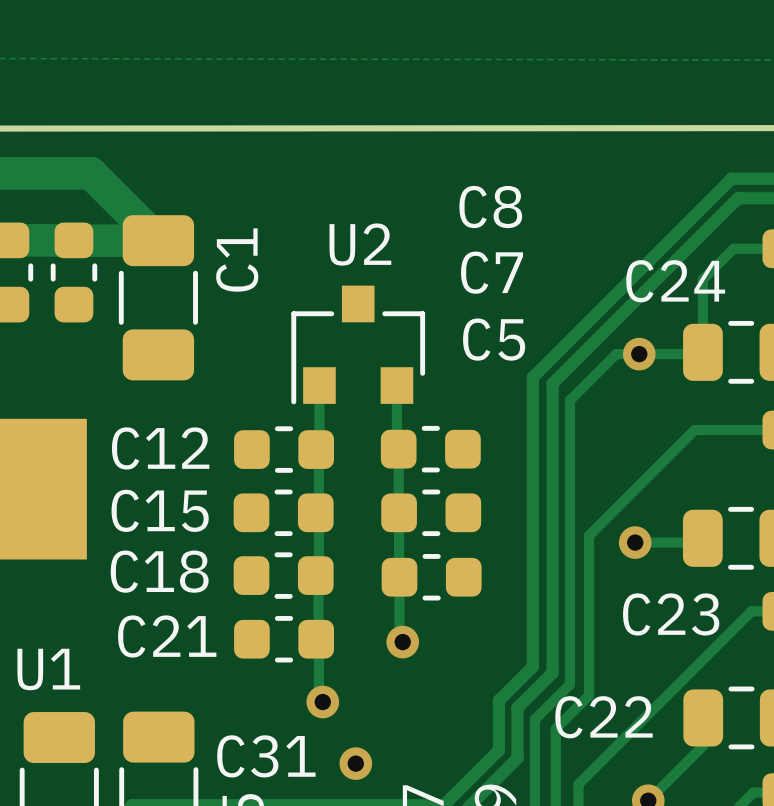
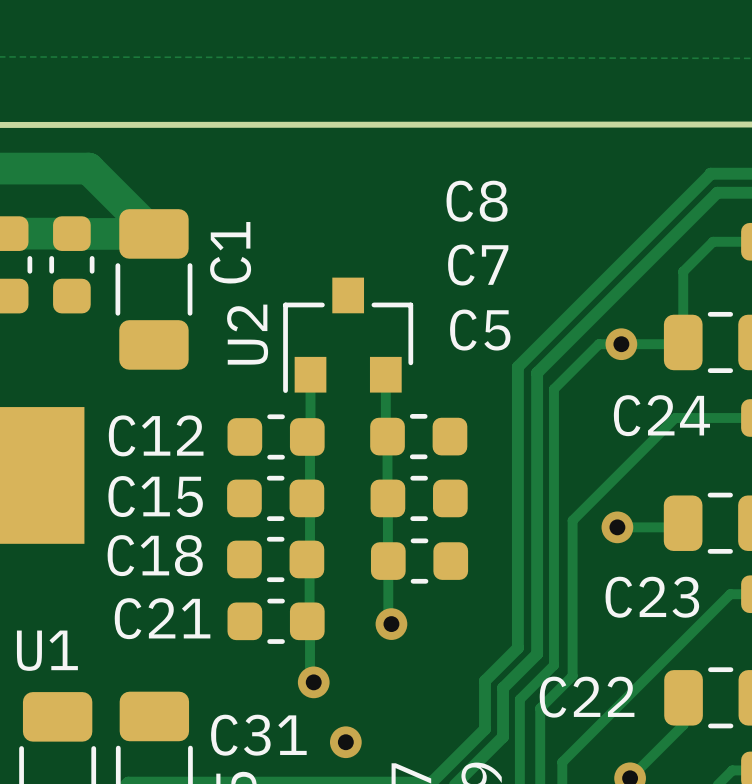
U2 name rotation: 0° (360, 244) -> 90° counterclockwise (247, 334)
U2 name position: U2 (360, 244) -> U2 (247, 334)
C24 name position: C24 (675, 281) -> C24 (661, 415)

